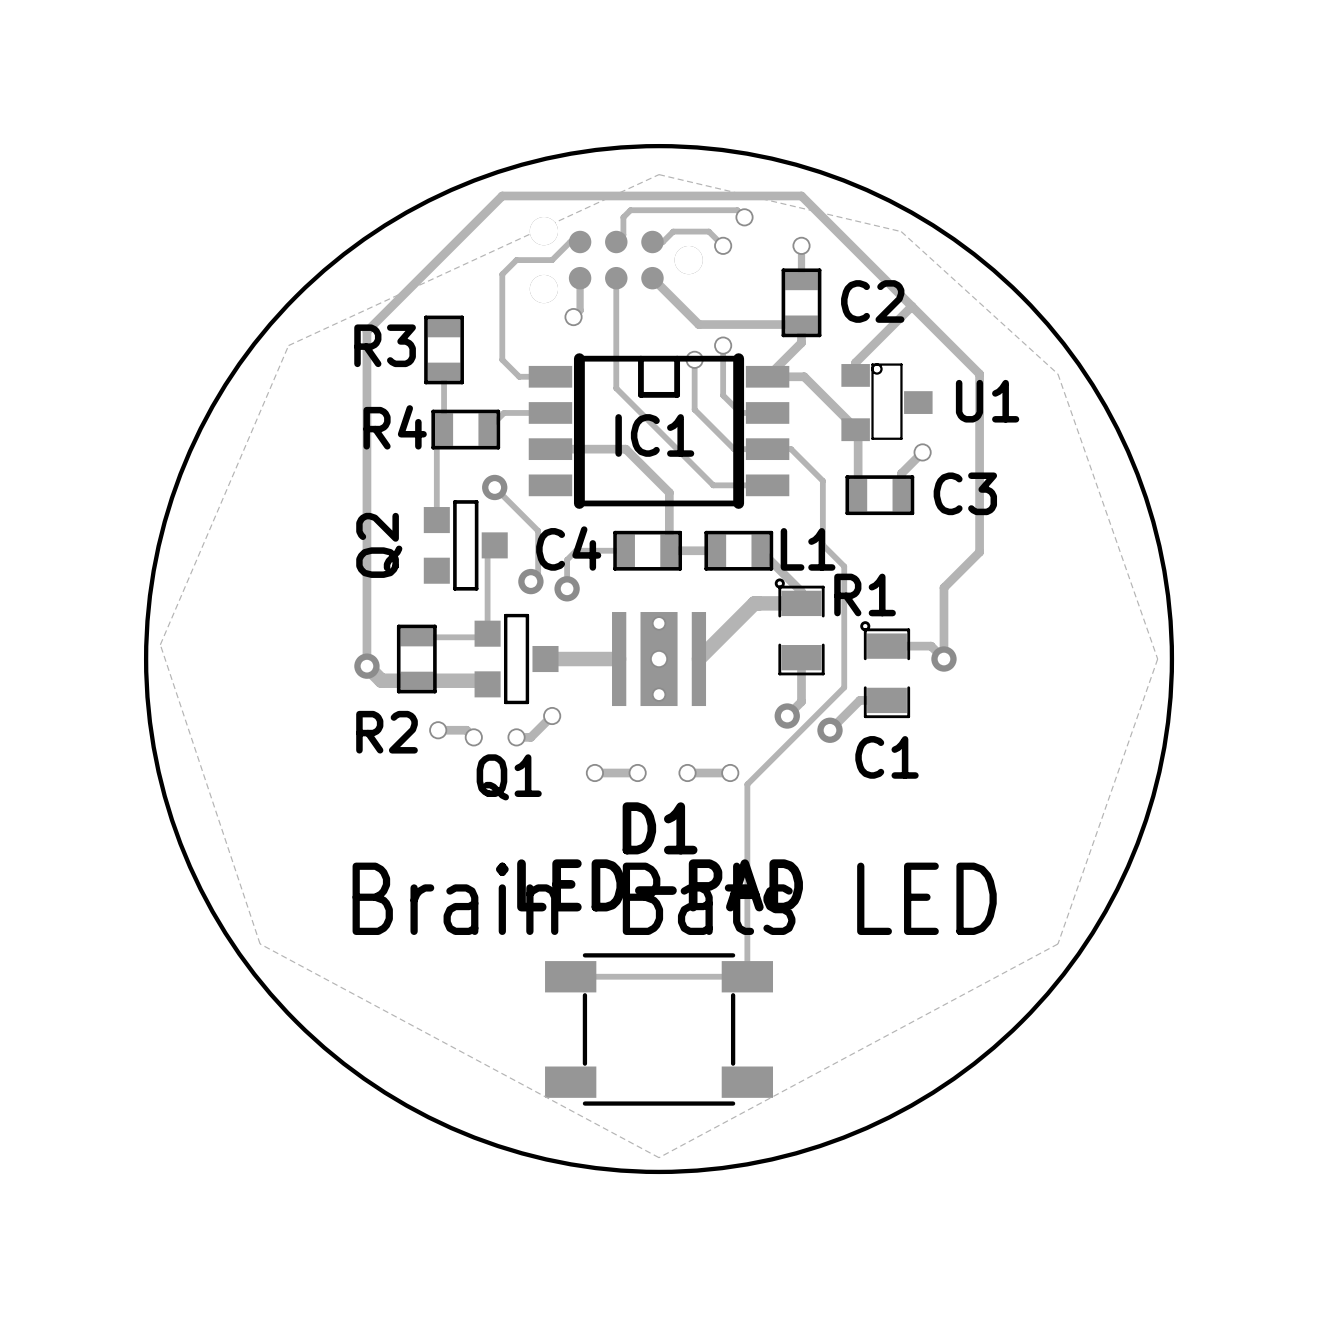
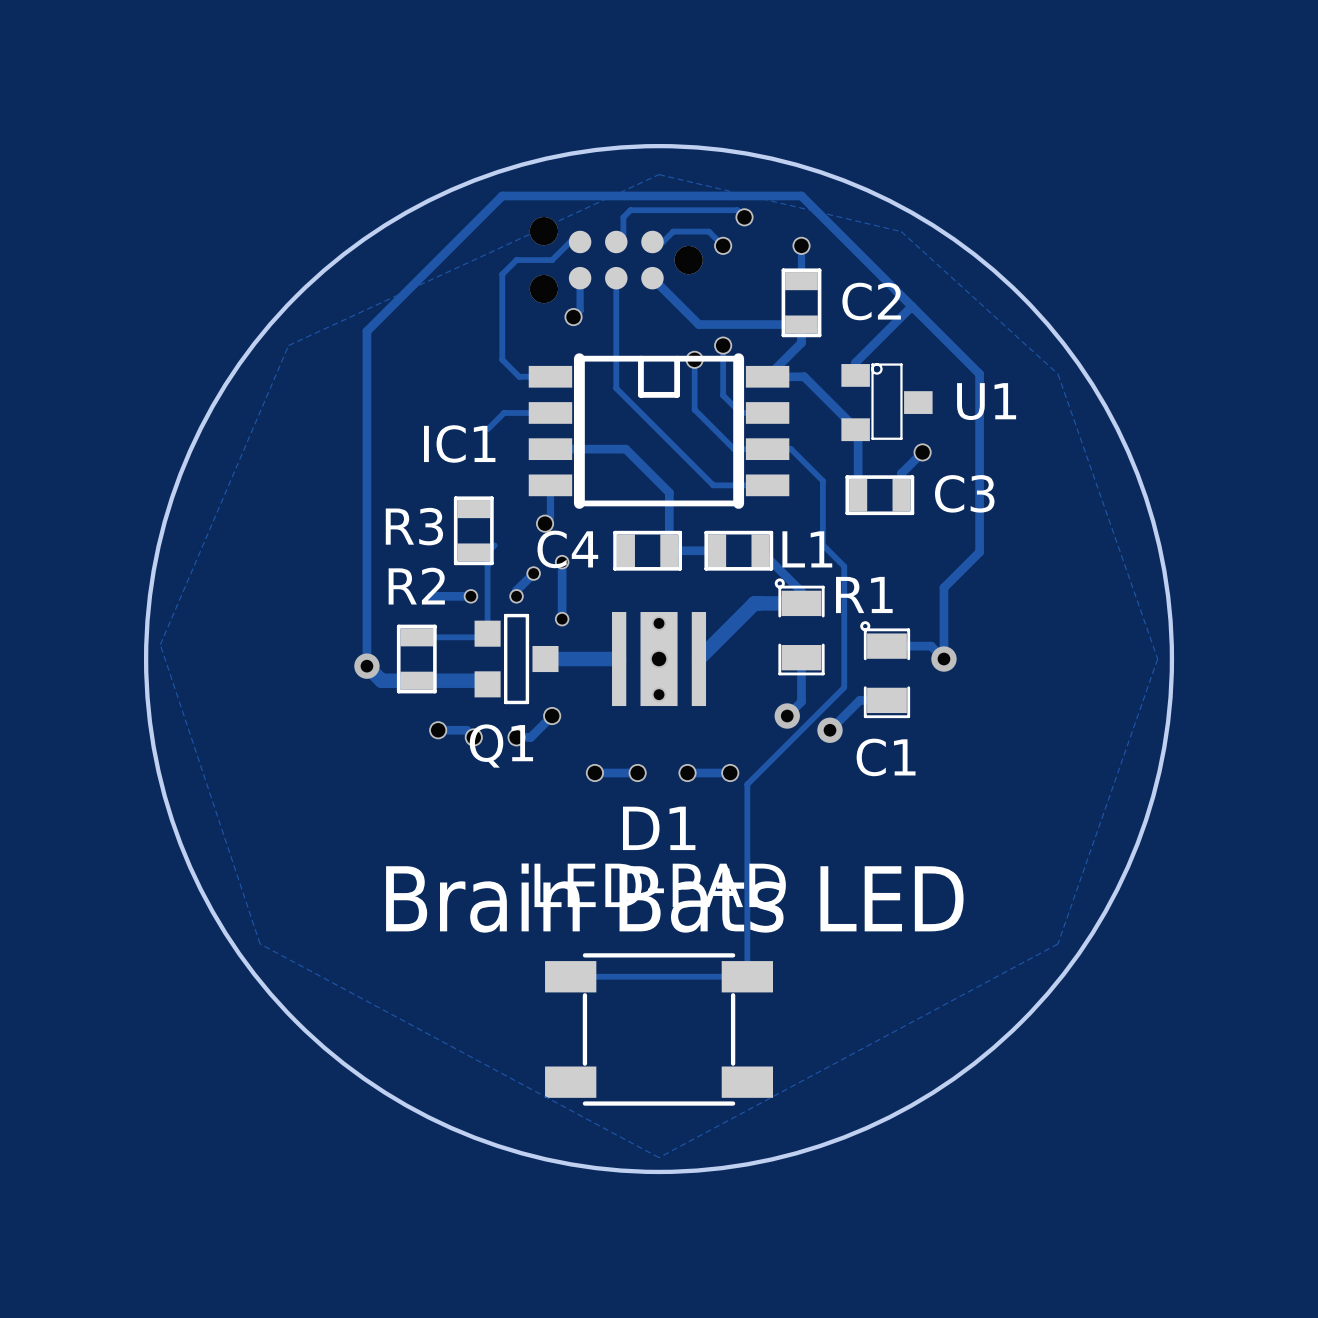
R3 position: (444, 349) -> (473, 530)
track: (444, 371) (444, 429) (436, 436) (436, 520) -> none
R4: (465, 429) -> none
IC1 name position: IC1 (654, 435) -> IC1 (459, 443)
track: none -> (550, 485) (550, 518) (545, 523)
track: (494, 487) (538, 530) (538, 574) (530, 581) -> none
via: (494, 487) -> none
via: none -> (545, 523)
Q2: (465, 545) -> none
track: (625, 550) (576, 550) (567, 559) (567, 588) -> none
track: none -> (562, 562) (562, 619)
via: none -> (562, 562)
via size: [518, 568, 544, 595] -> [526, 566, 541, 581]
track: none -> (533, 573) (516, 590) (516, 596)
via: (567, 588) -> none
track: none -> (431, 596) (470, 596)
via: none -> (470, 596)
via: none -> (516, 596)
via: none -> (562, 619)
R2 name position: R2 (387, 732) -> R2 (416, 586)
Q1 name position: Q1 (509, 777) -> Q1 (501, 746)

